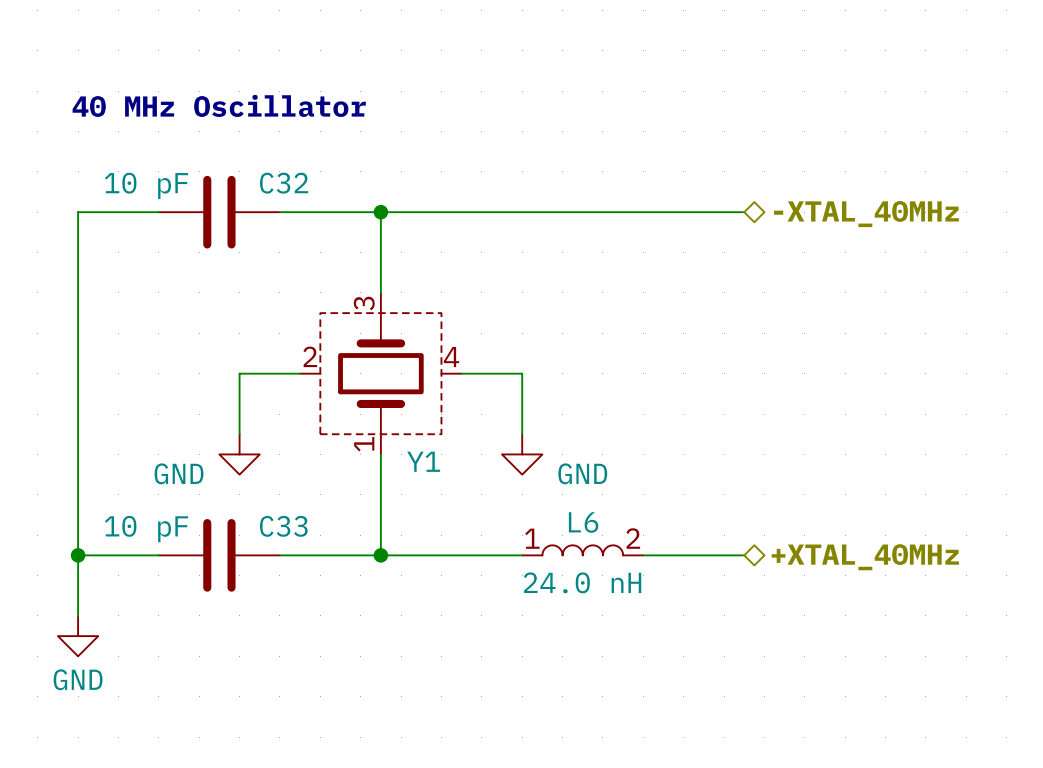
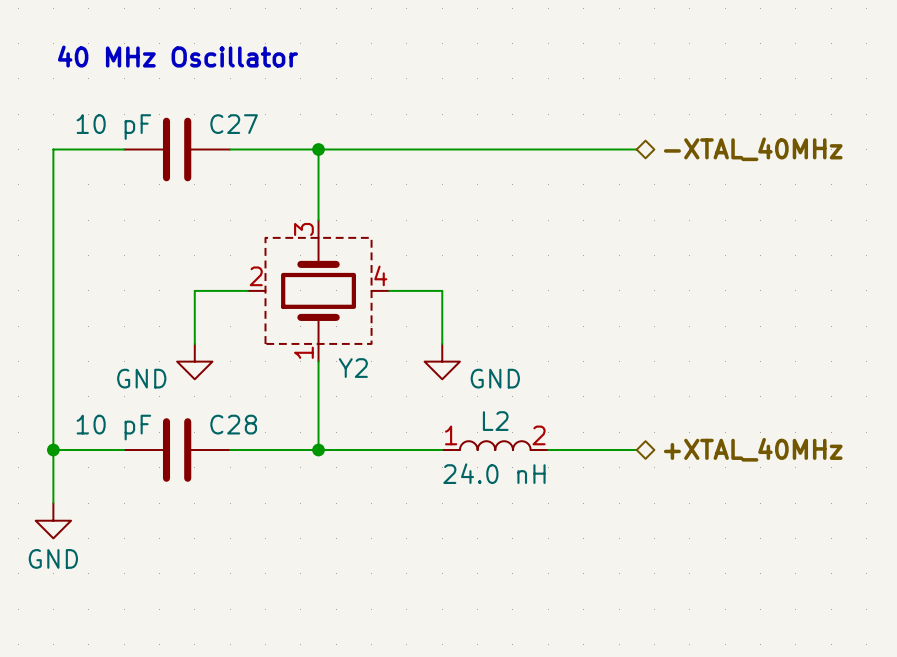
C32 name: C32 (284, 183) -> C27 (234, 124)
Y1 name: Y1 (423, 461) -> Y2 (353, 368)
L6 name: L6 (583, 522) -> L2 (495, 421)
C33 name: C33 (283, 526) -> C28 (233, 424)

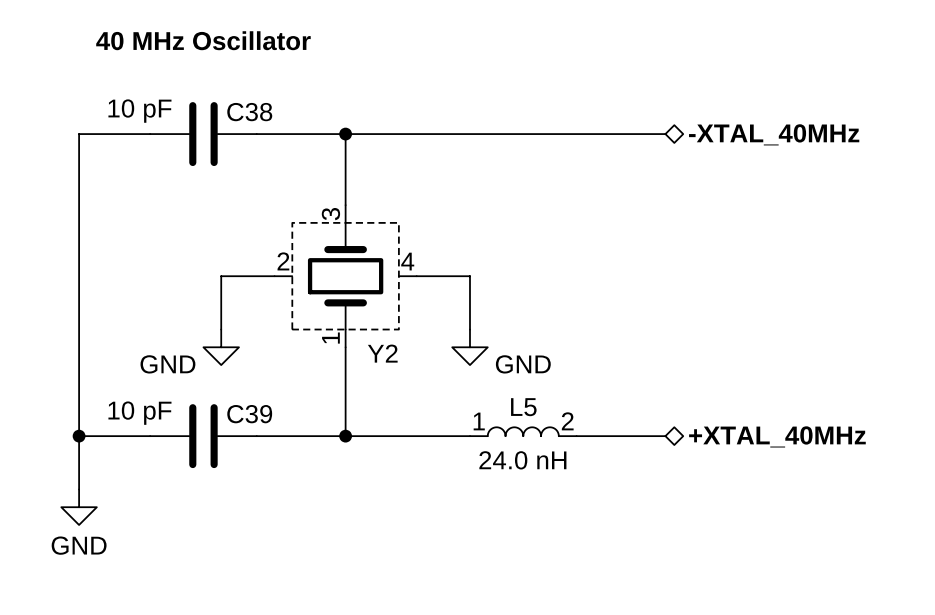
C27 name: C27 (234, 124) -> C38 (249, 112)
L2 name: L2 (495, 421) -> L5 (523, 407)
C28 name: C28 (233, 424) -> C39 (249, 414)

